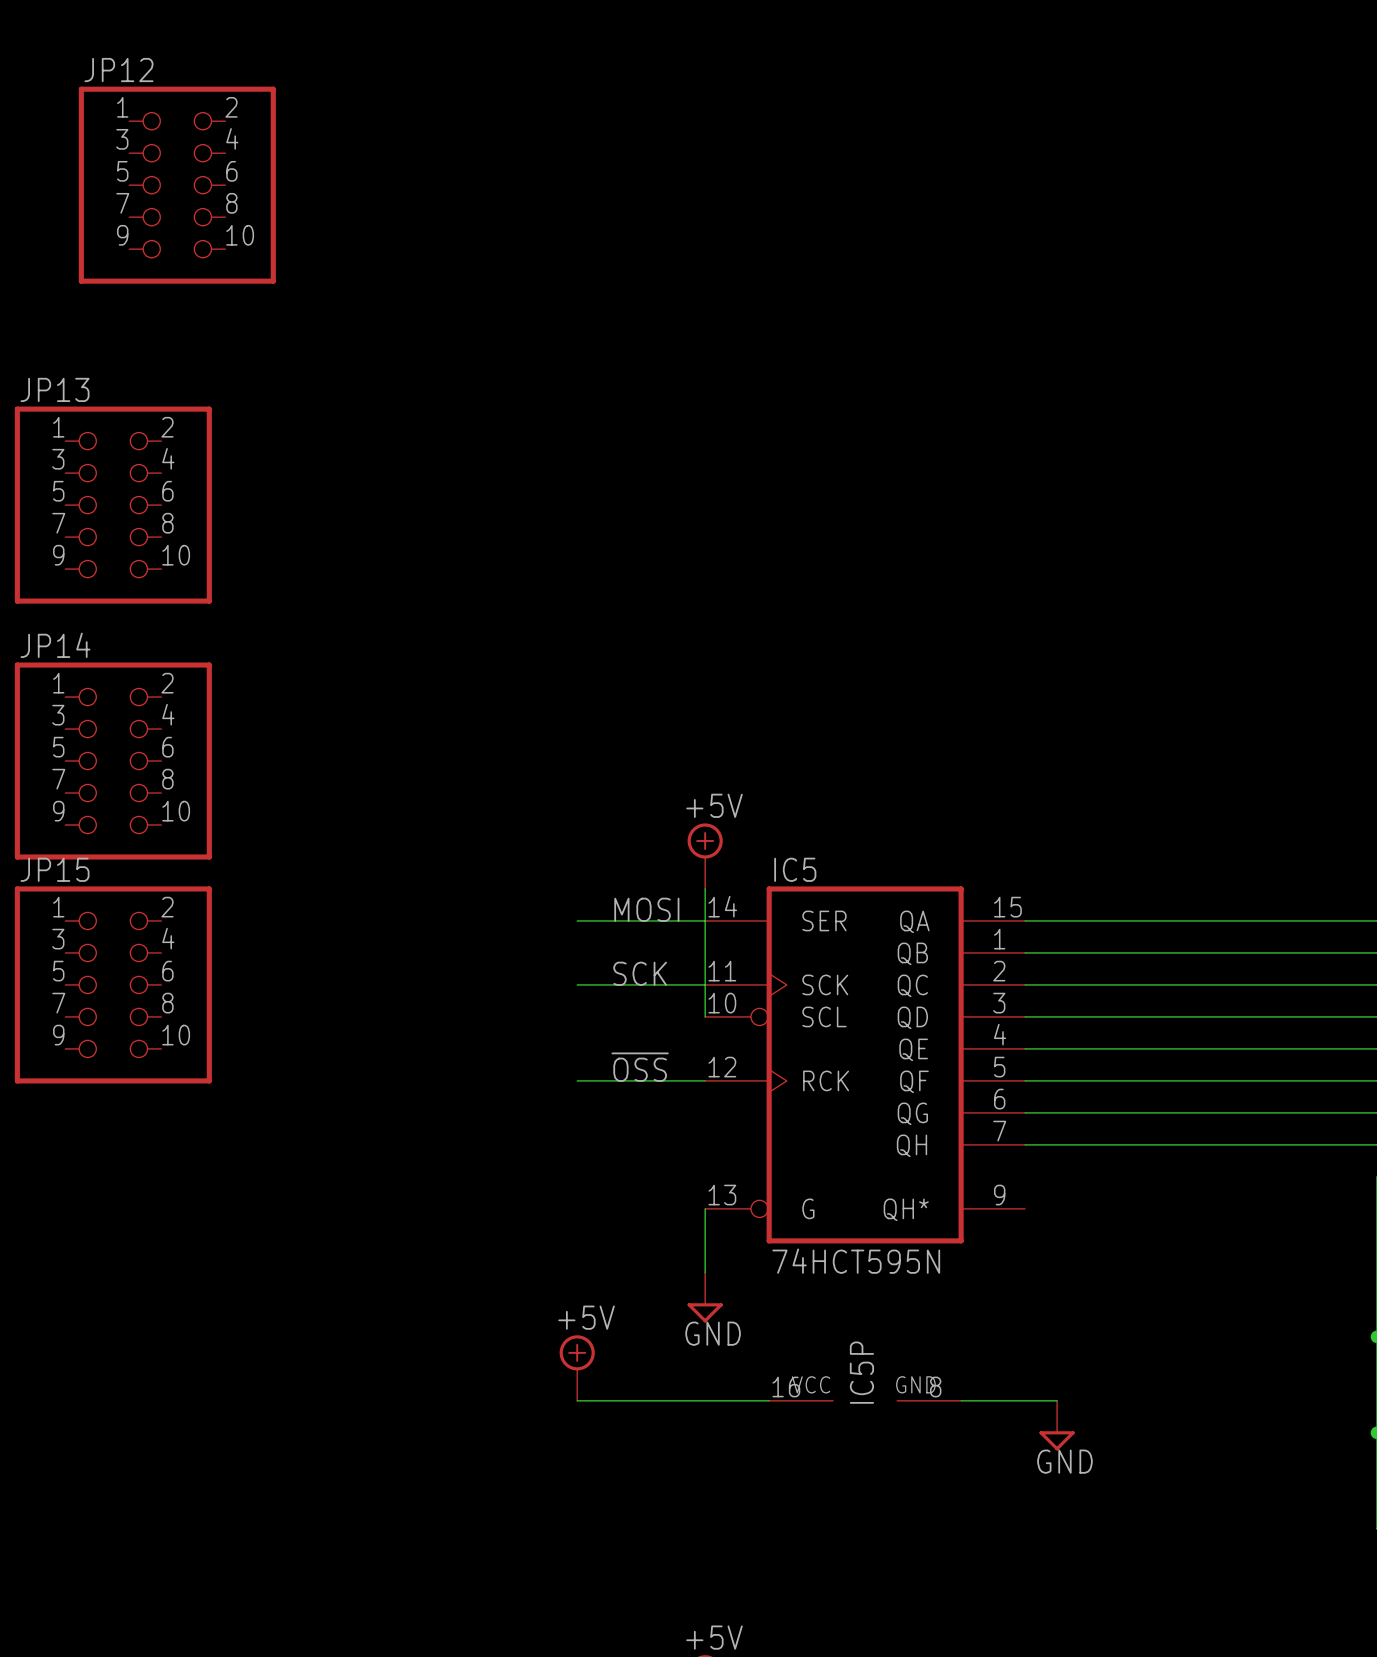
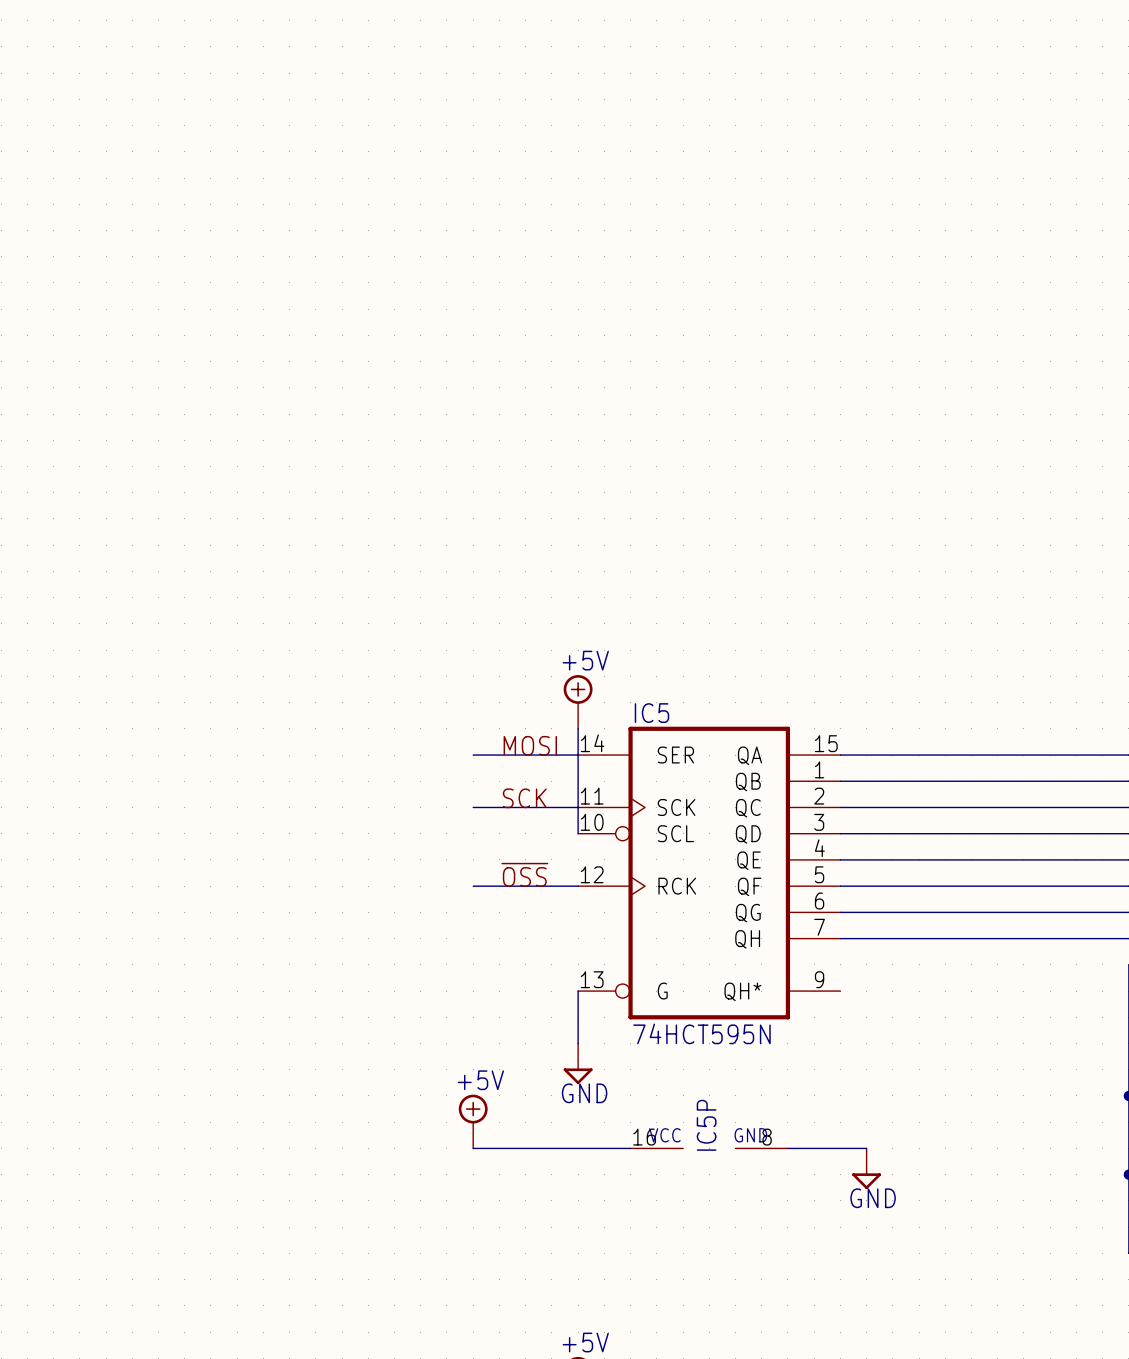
JP12: (177, 185) -> none
JP13: (113, 505) -> none
JP14: (113, 761) -> none
JP15: (113, 984) -> none

